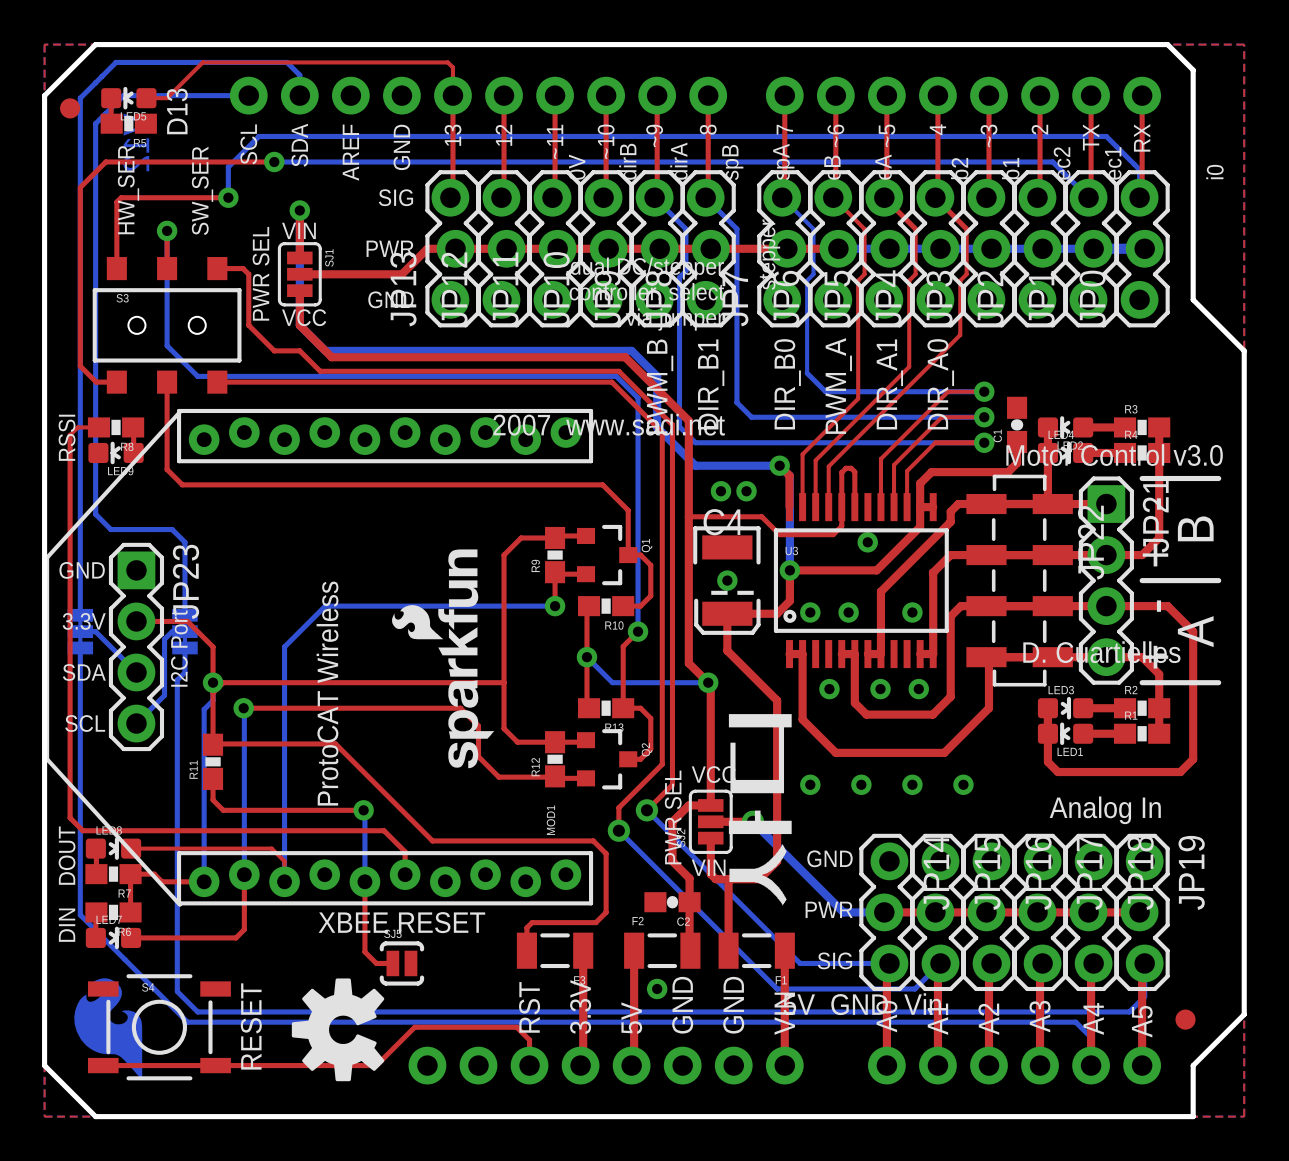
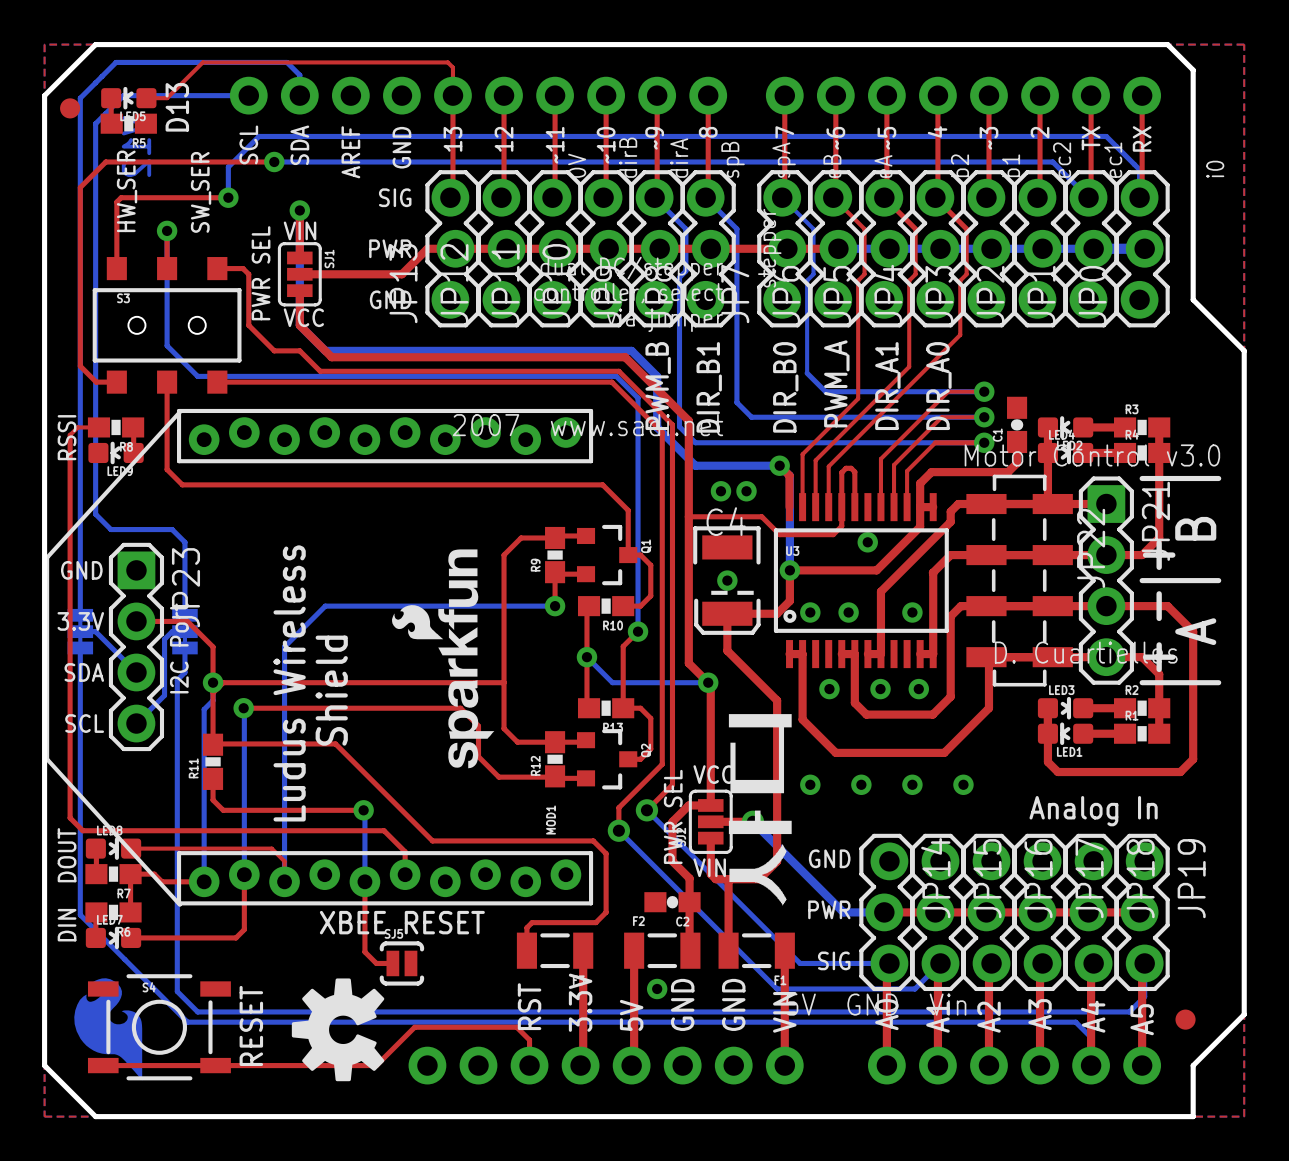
text: ProtoCAT Wireless (327, 693) -> none
text: none -> Ludus Wireless (289, 683)
text: none -> Shield (331, 690)

